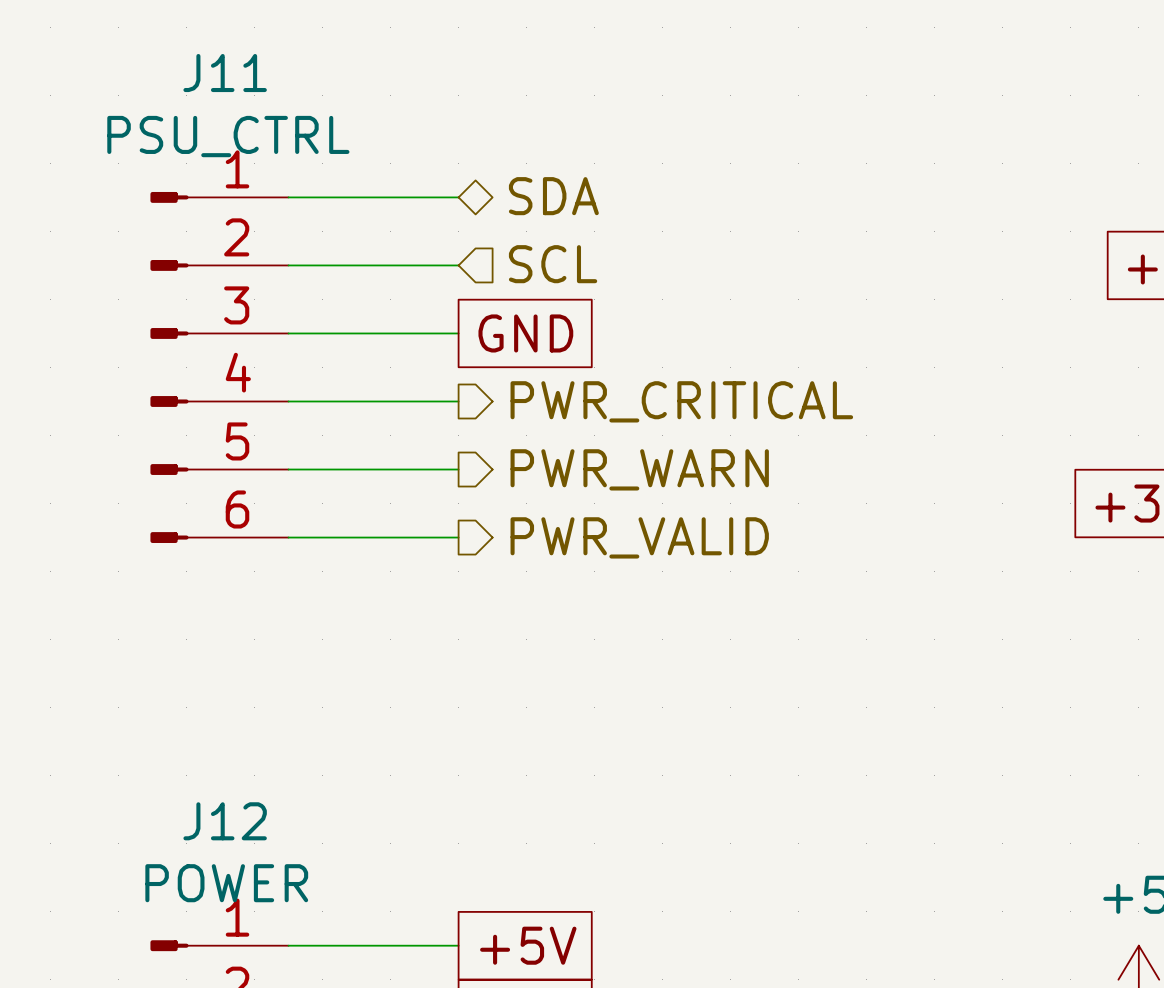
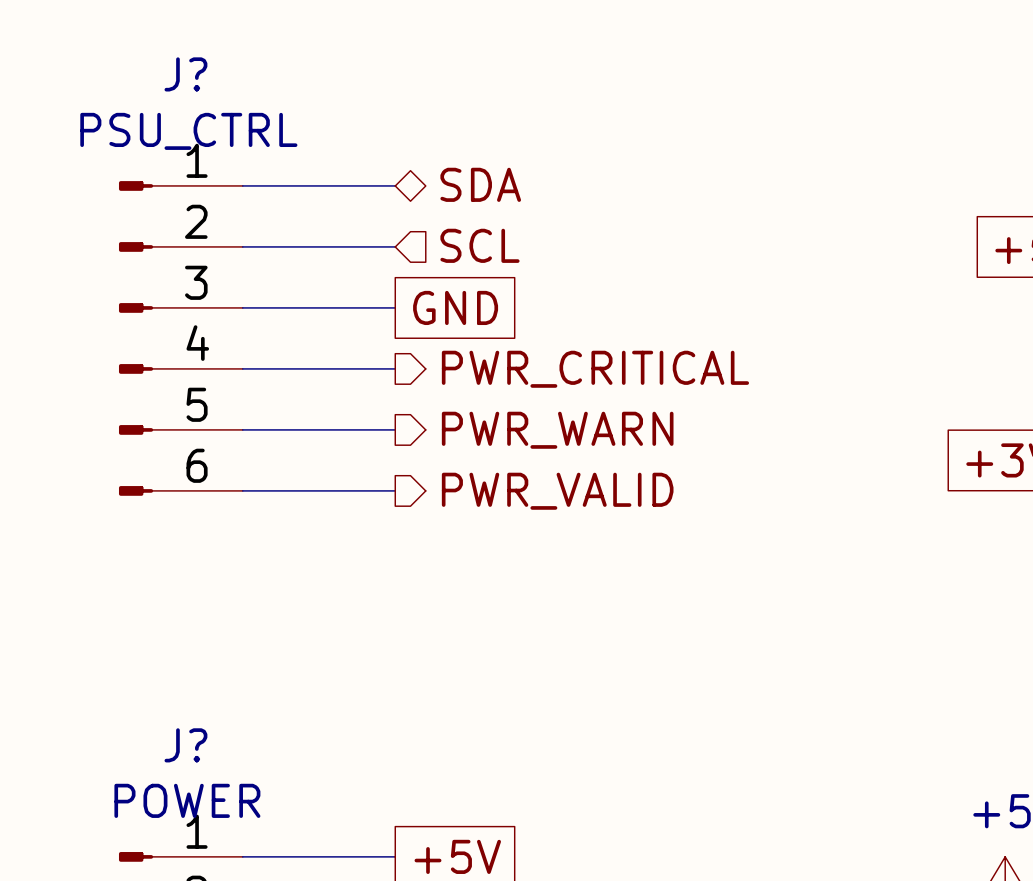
J11 name: J11 (225, 73) -> J? (185, 74)
J12 name: J12 (225, 821) -> J? (185, 745)

